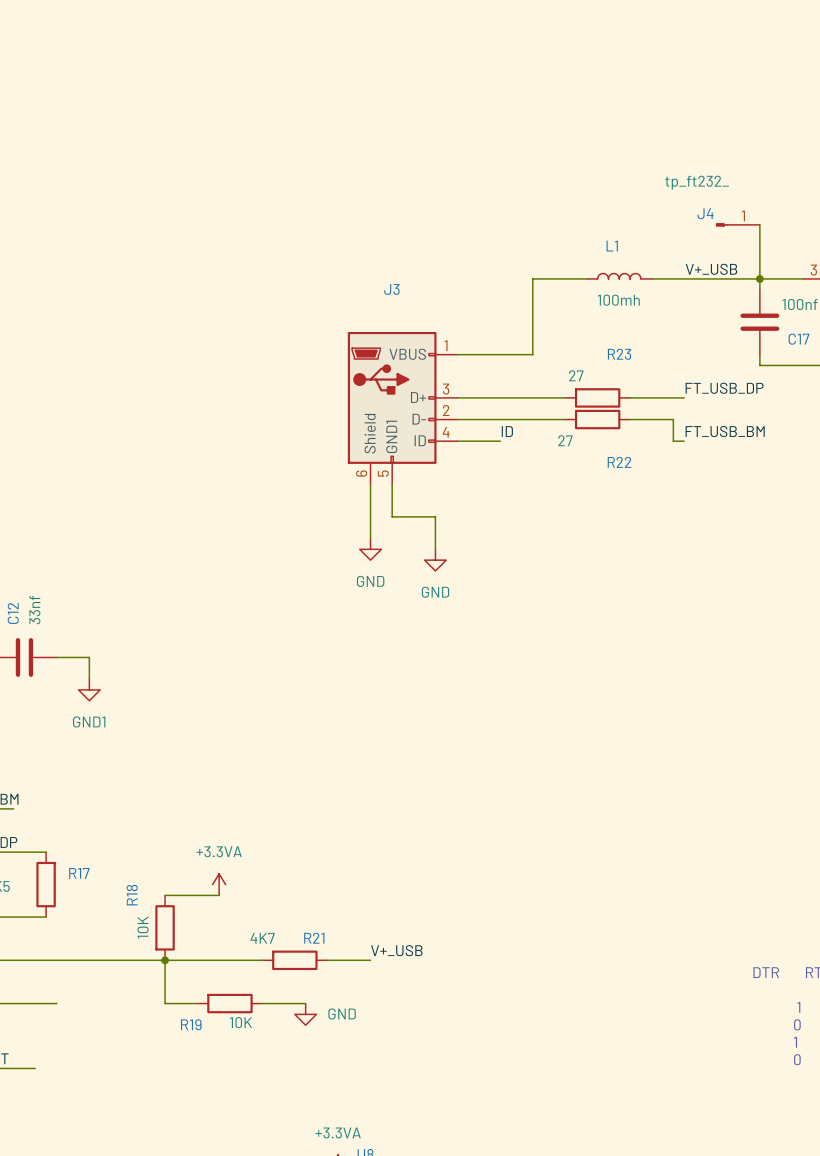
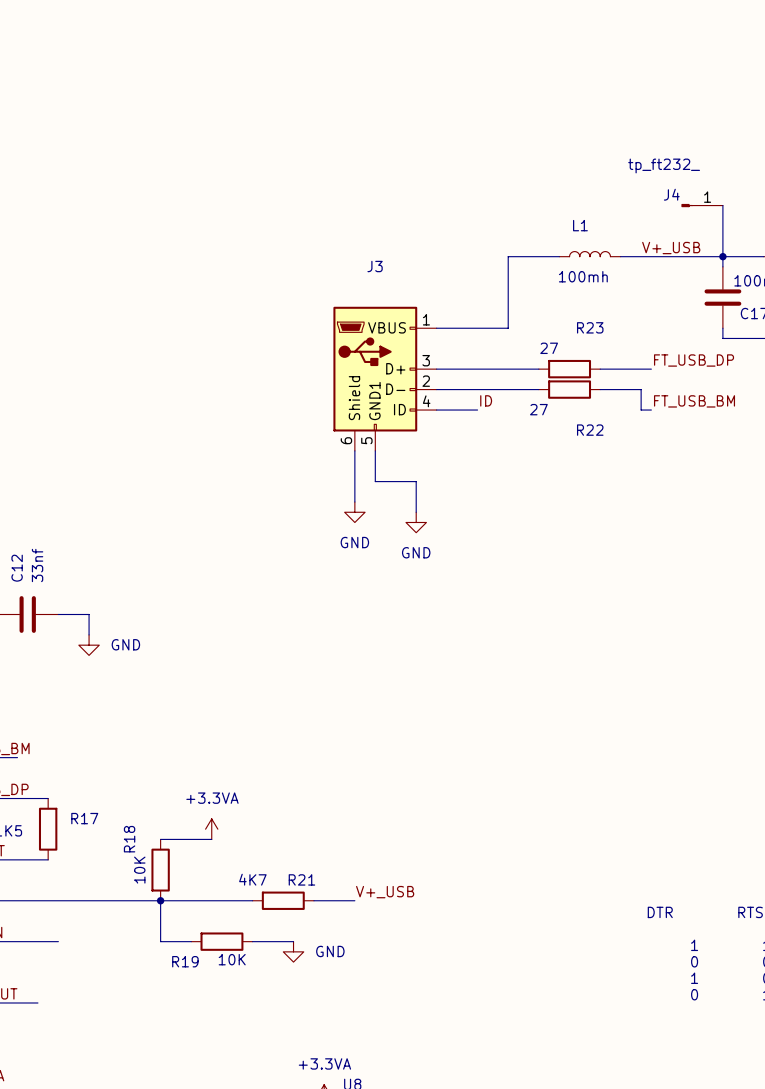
power symbol: GND1 (89, 689) -> GND (89, 645)

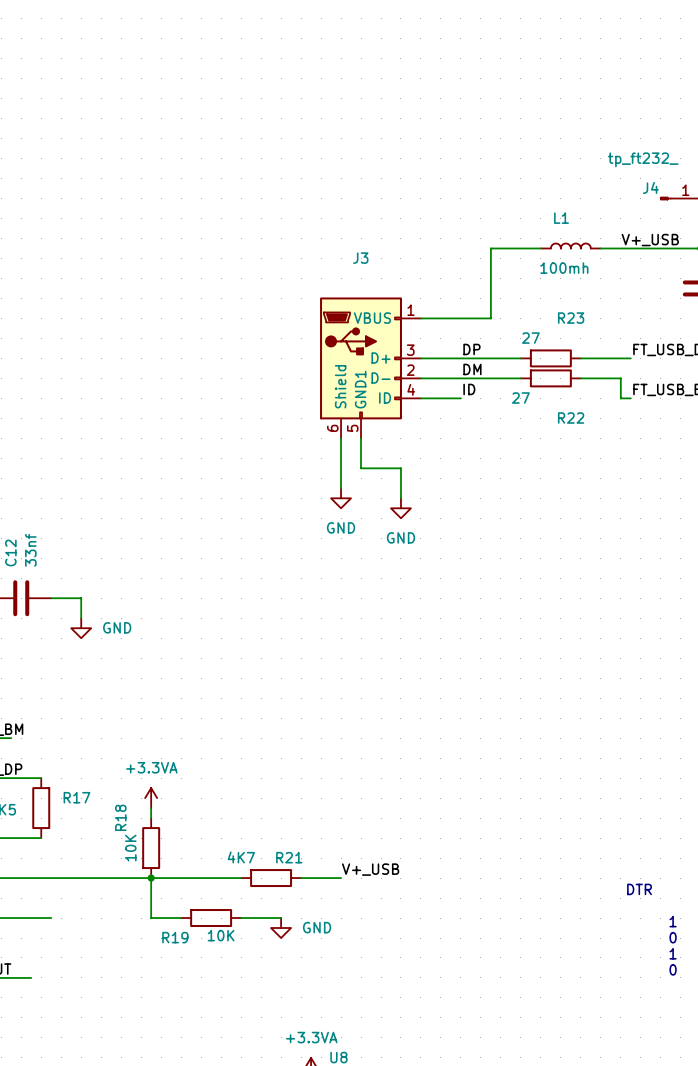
label: none -> DP (471, 349)
label: none -> DM (472, 369)
power symbol position: +3.3VA (211, 829) -> +3.3VA (151, 798)
wire: (160, 839) (211, 839) -> (151, 818) (151, 808)

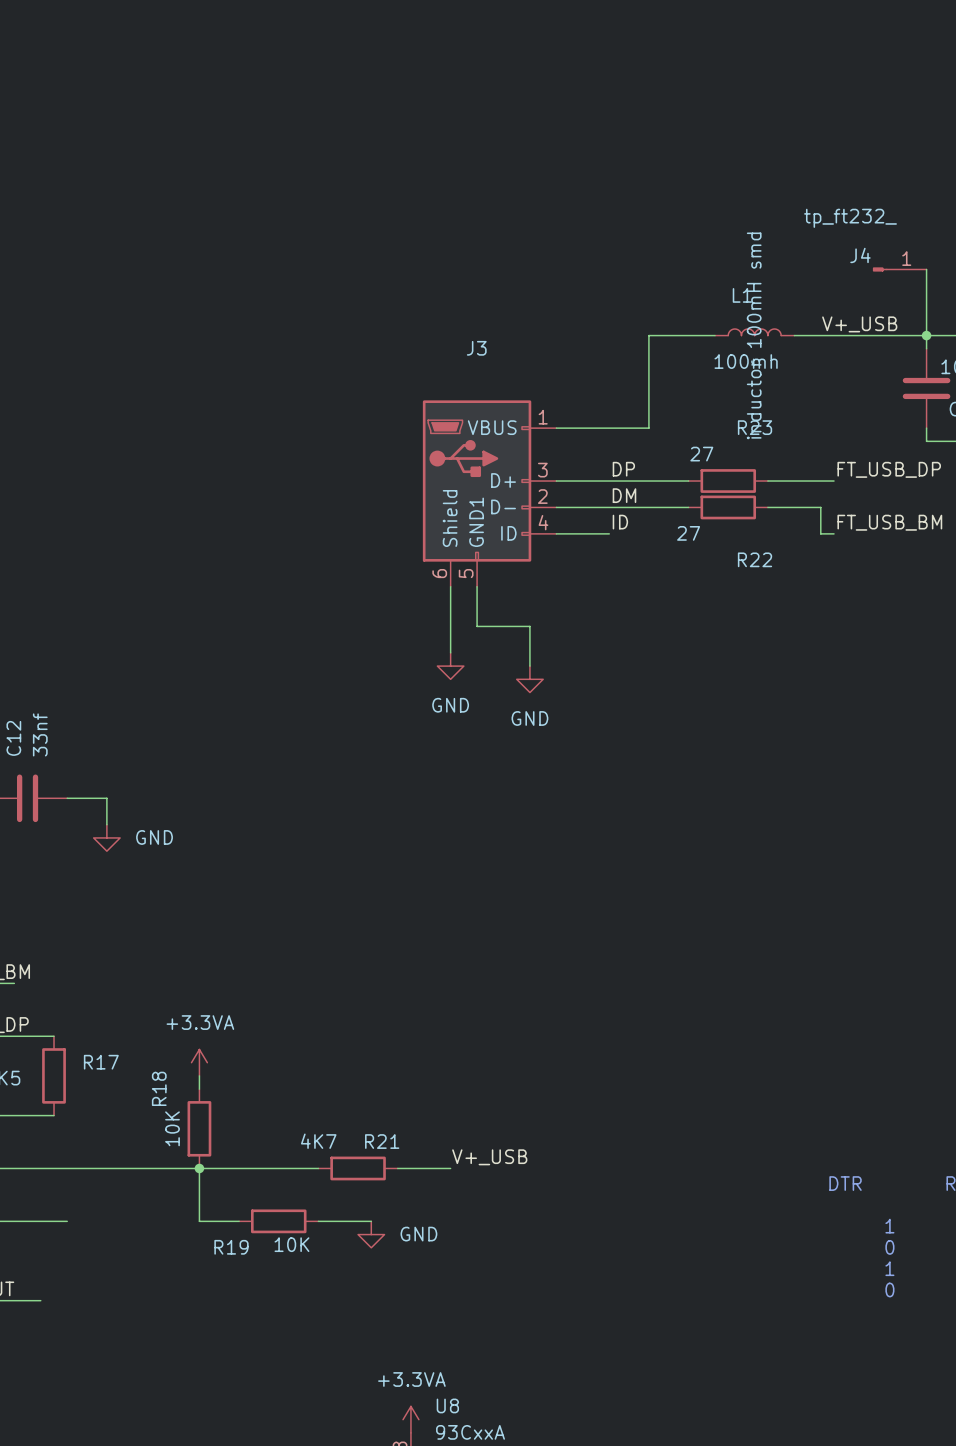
L1 text: none -> inductor 100mH smd (754, 335)

